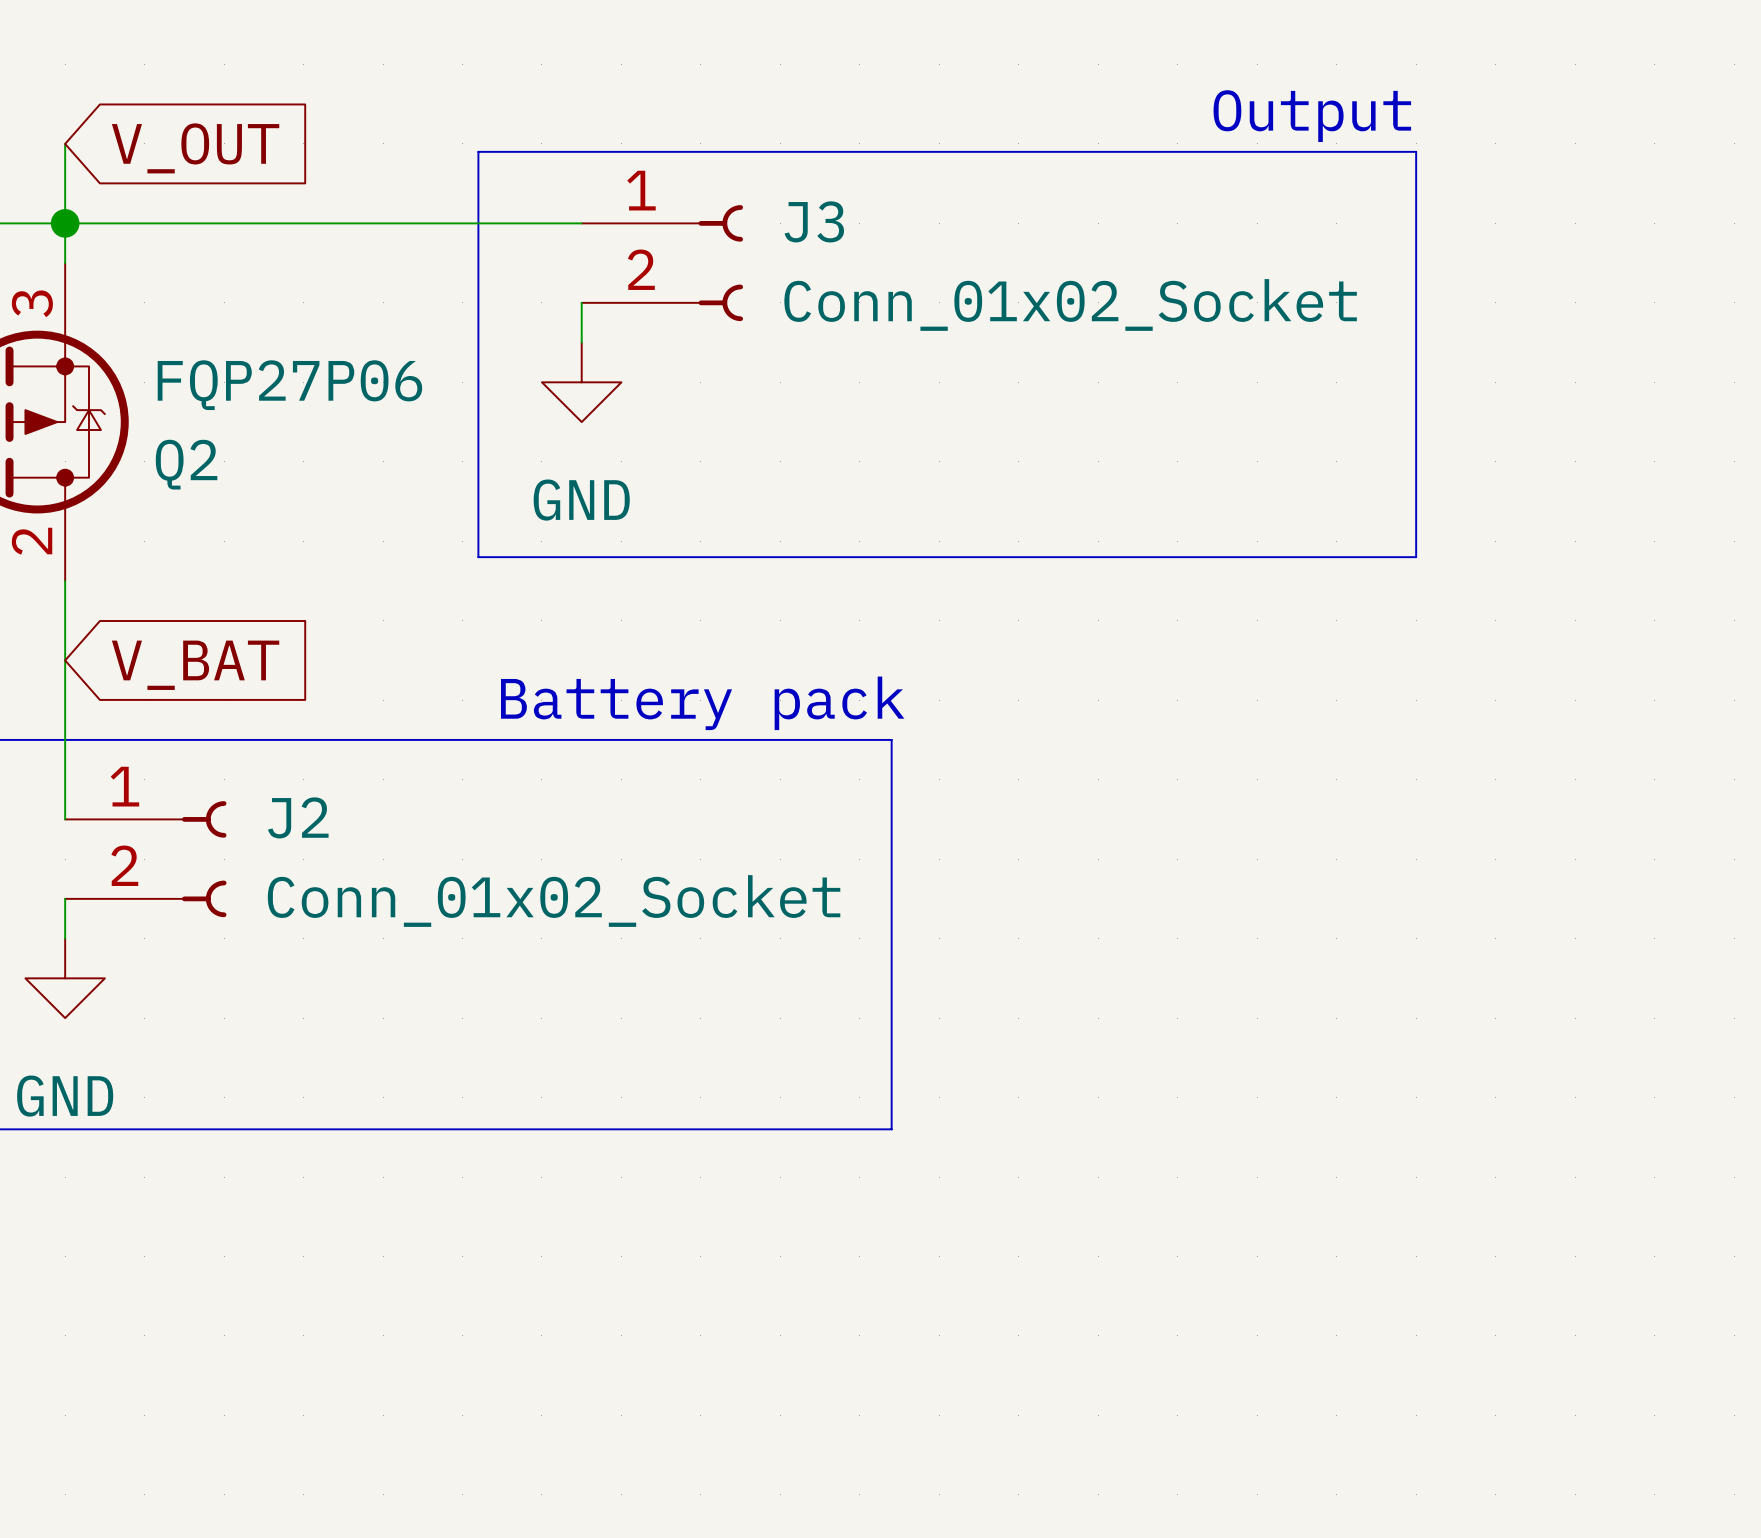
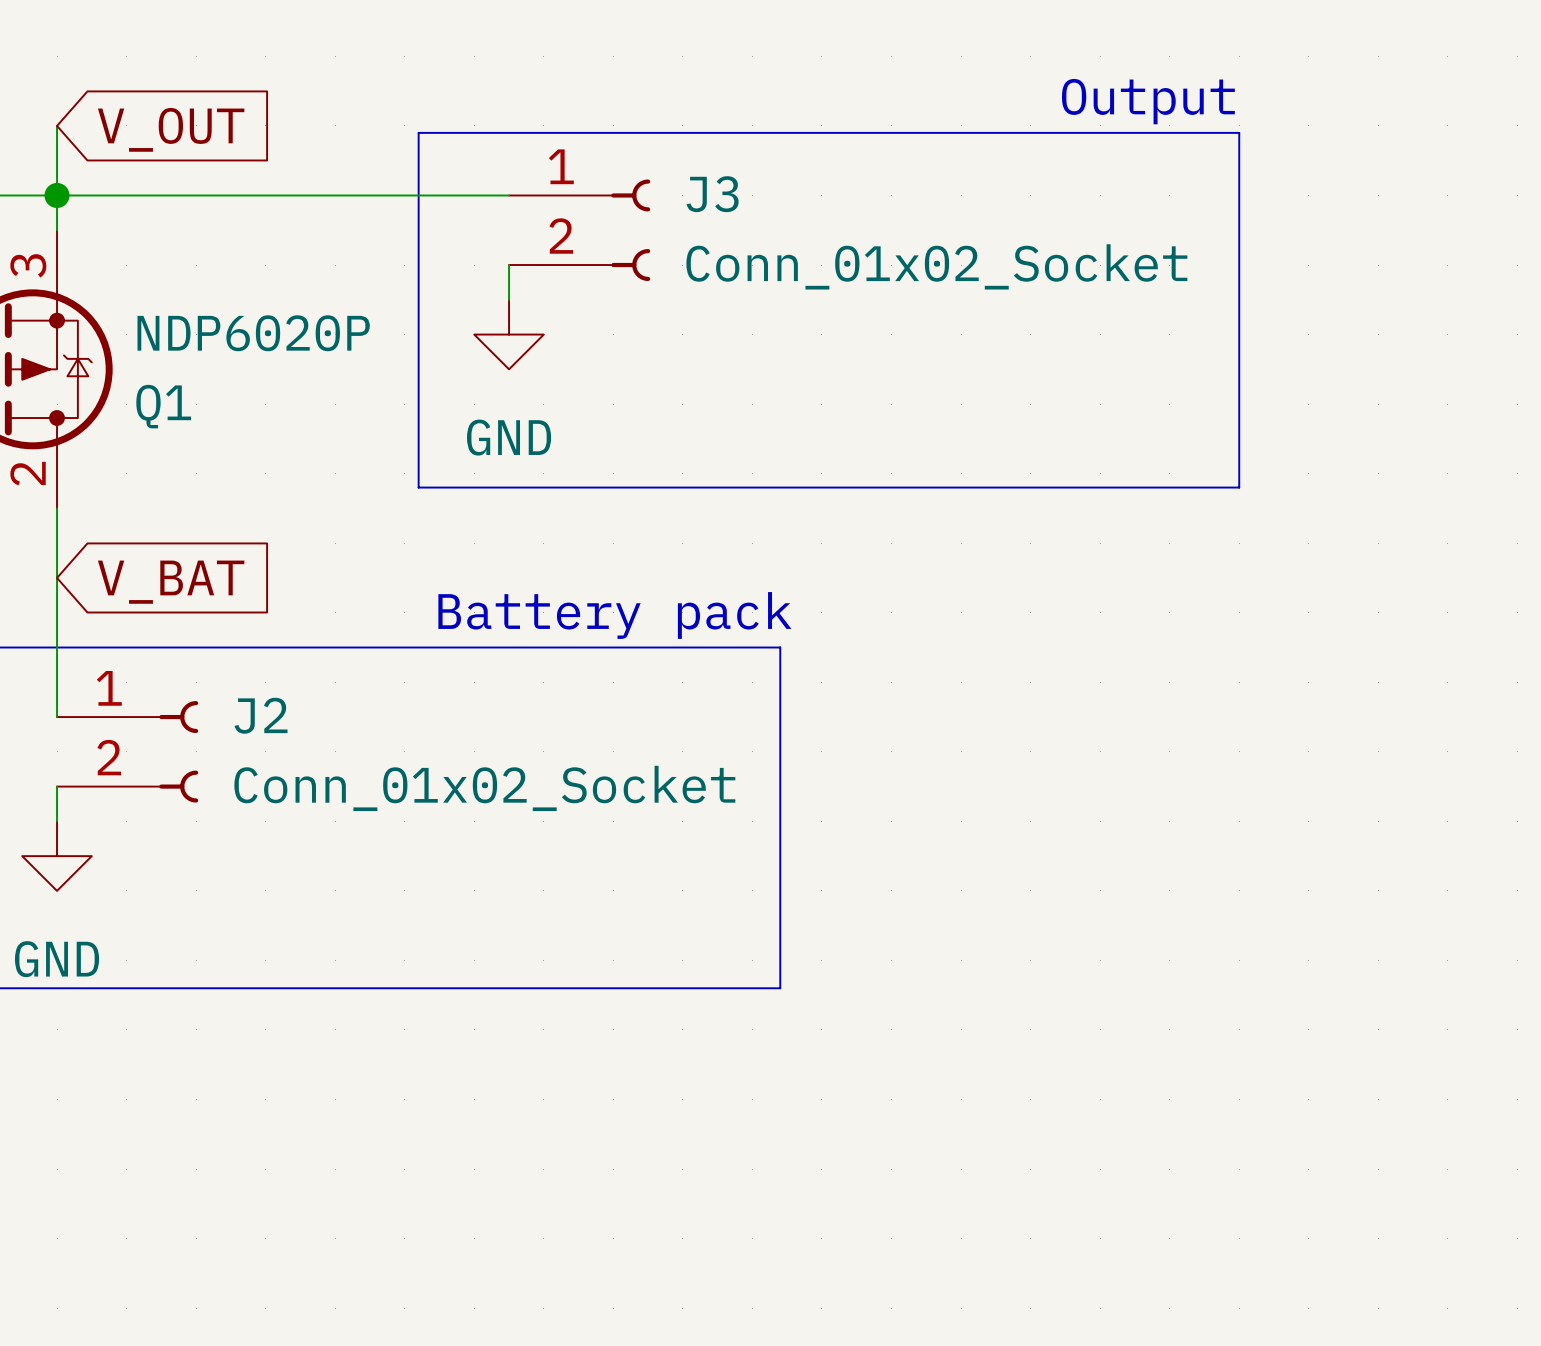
Q2 value: FQP27P06 (289, 385) -> NDP6020P (253, 333)
Q2 name: Q2 (186, 464) -> Q1 (163, 406)

